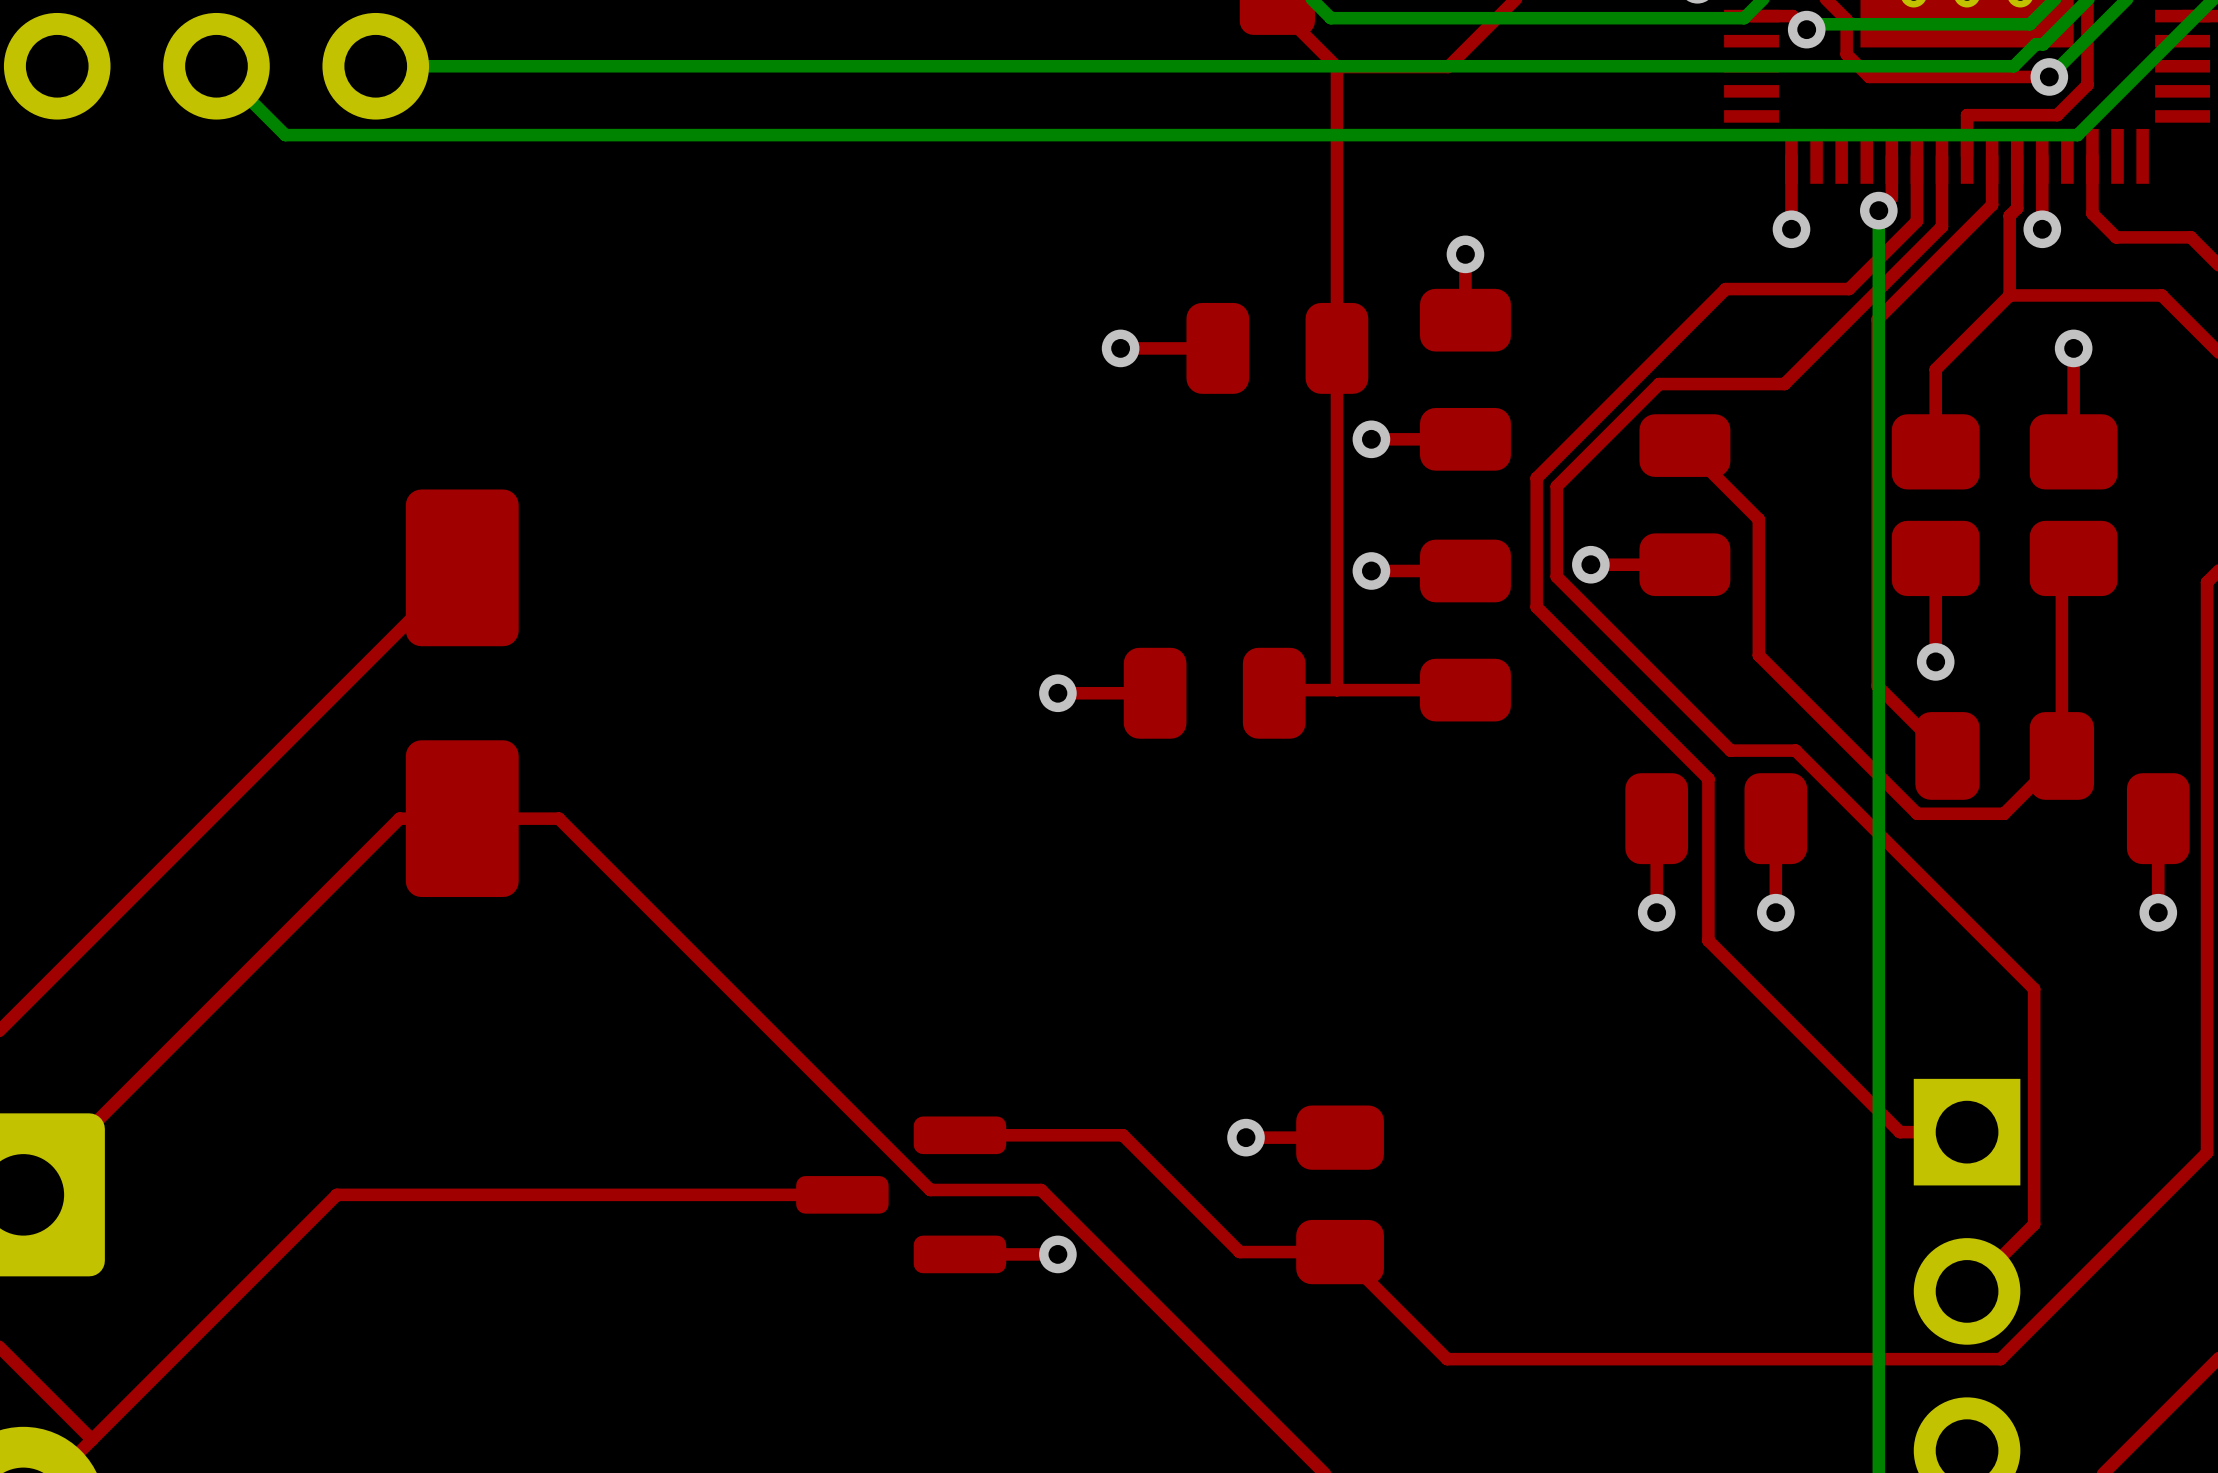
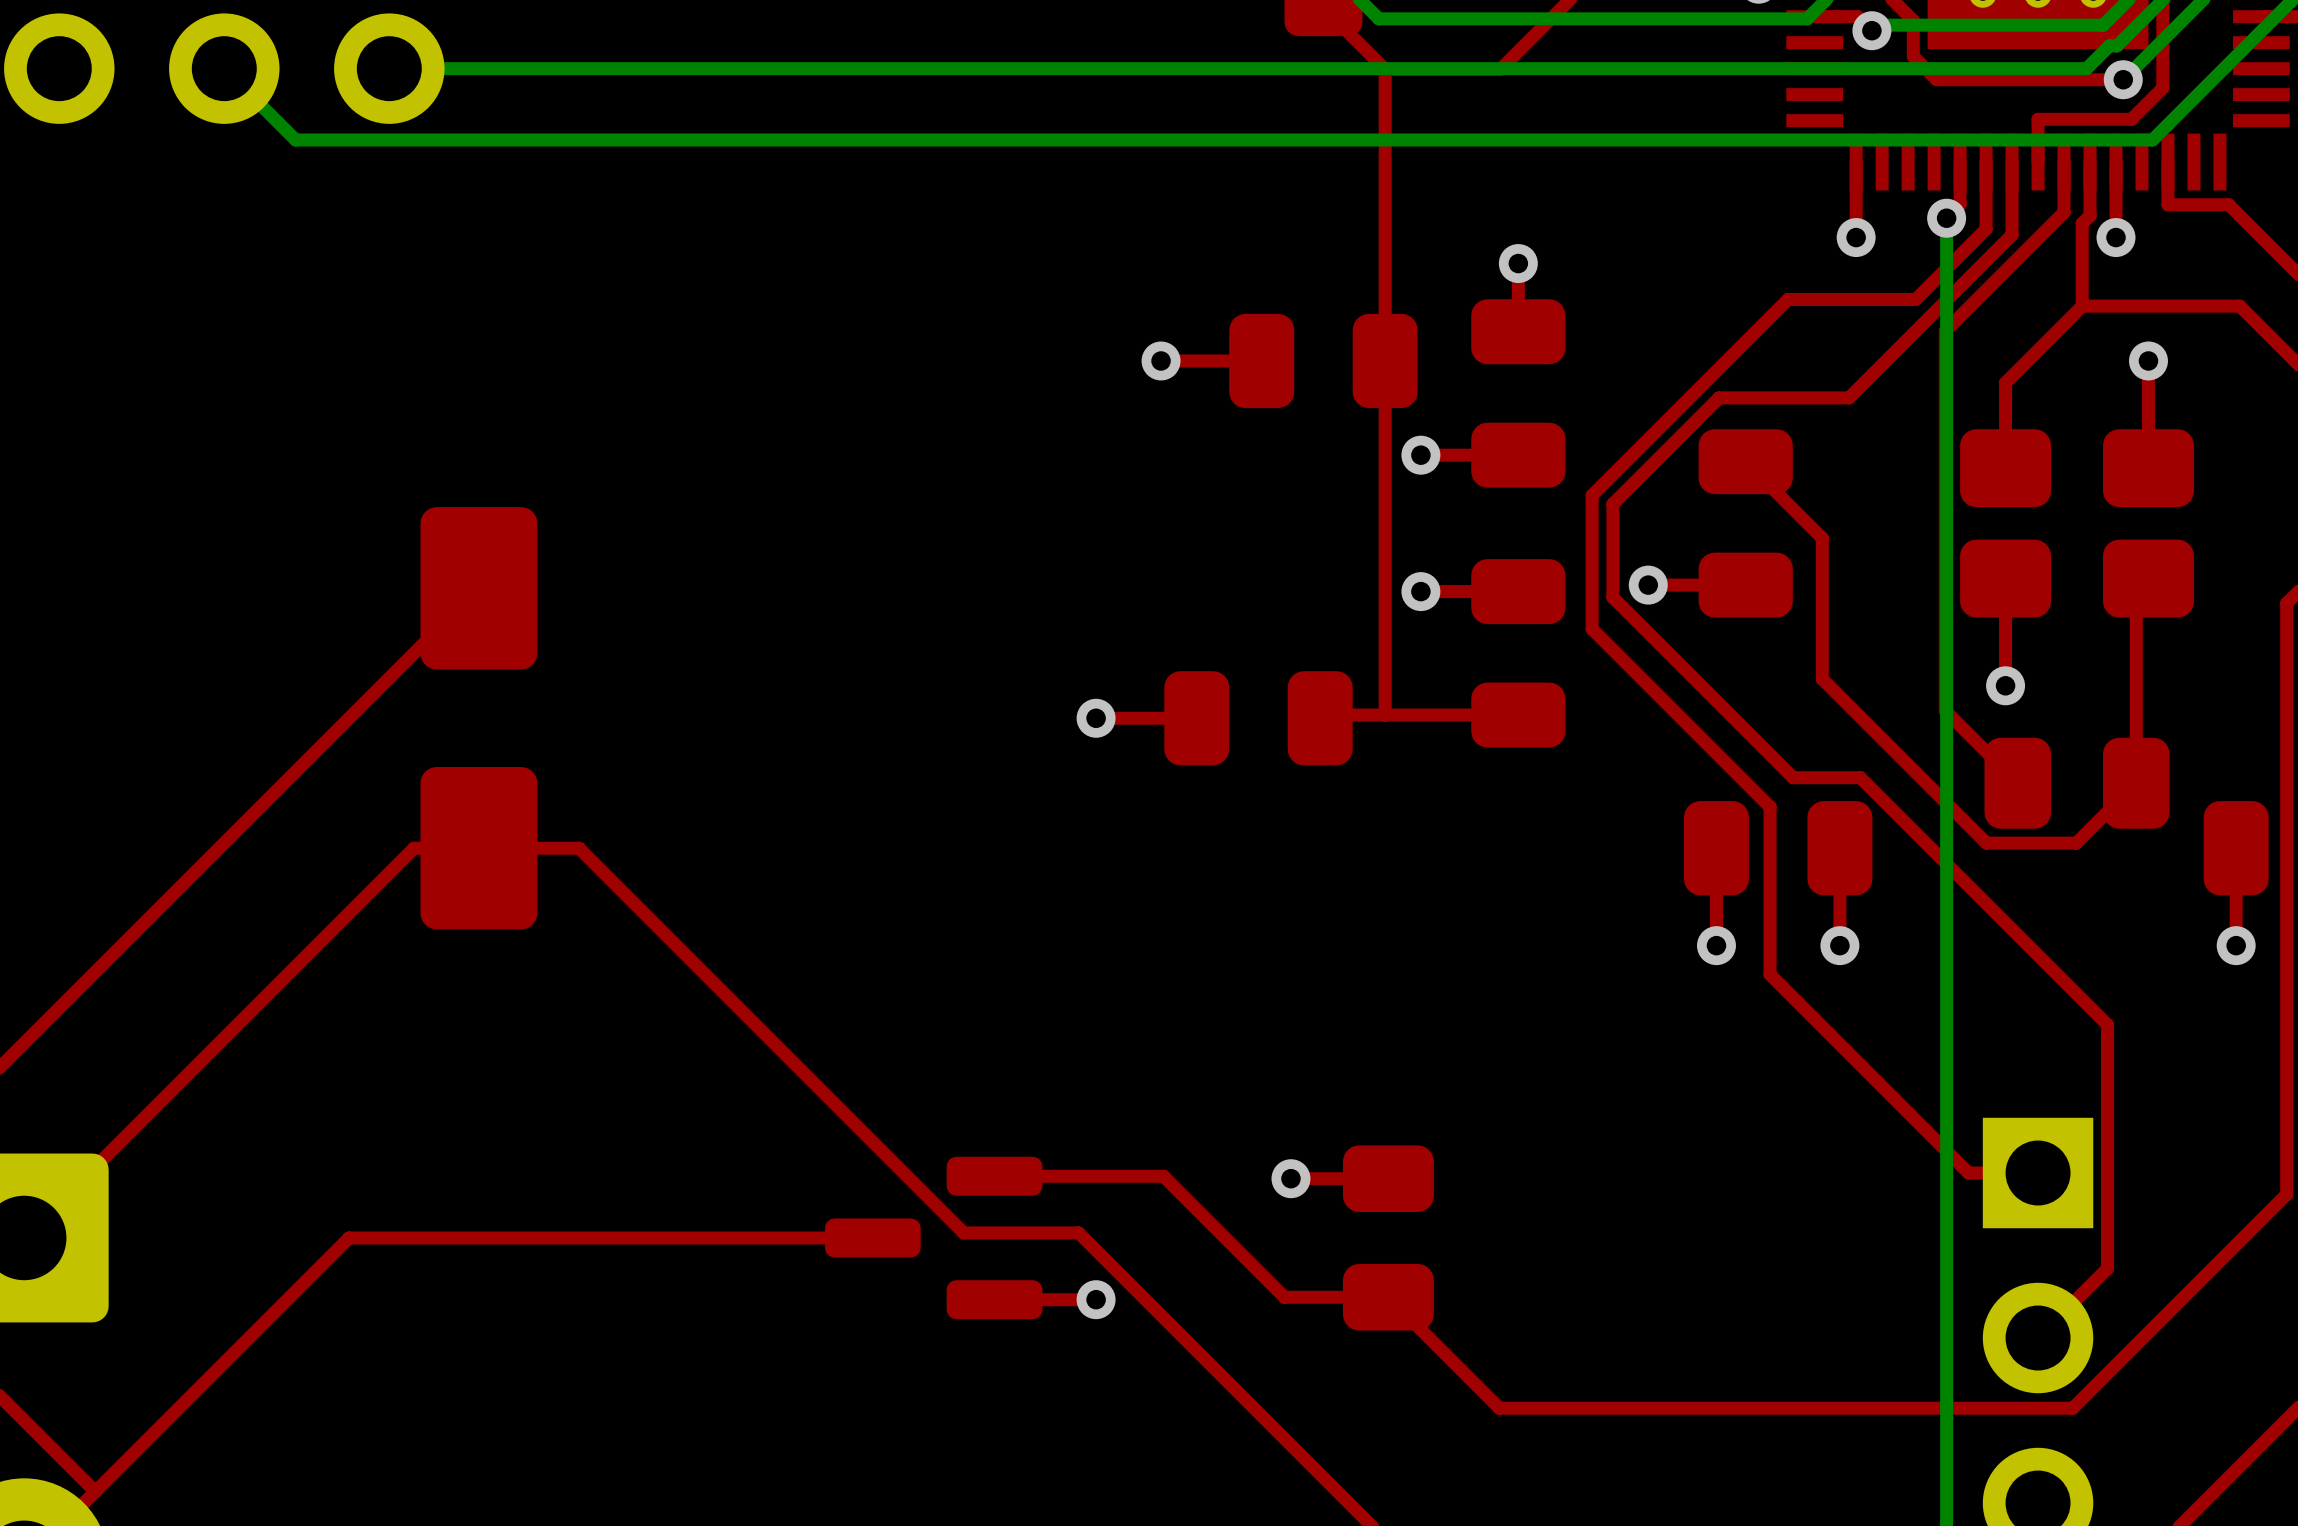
top track: (2092, 197) (2092, 213) (2116, 237) (2190, 237) -> (2167, 204) (2228, 204) (2270, 245)

